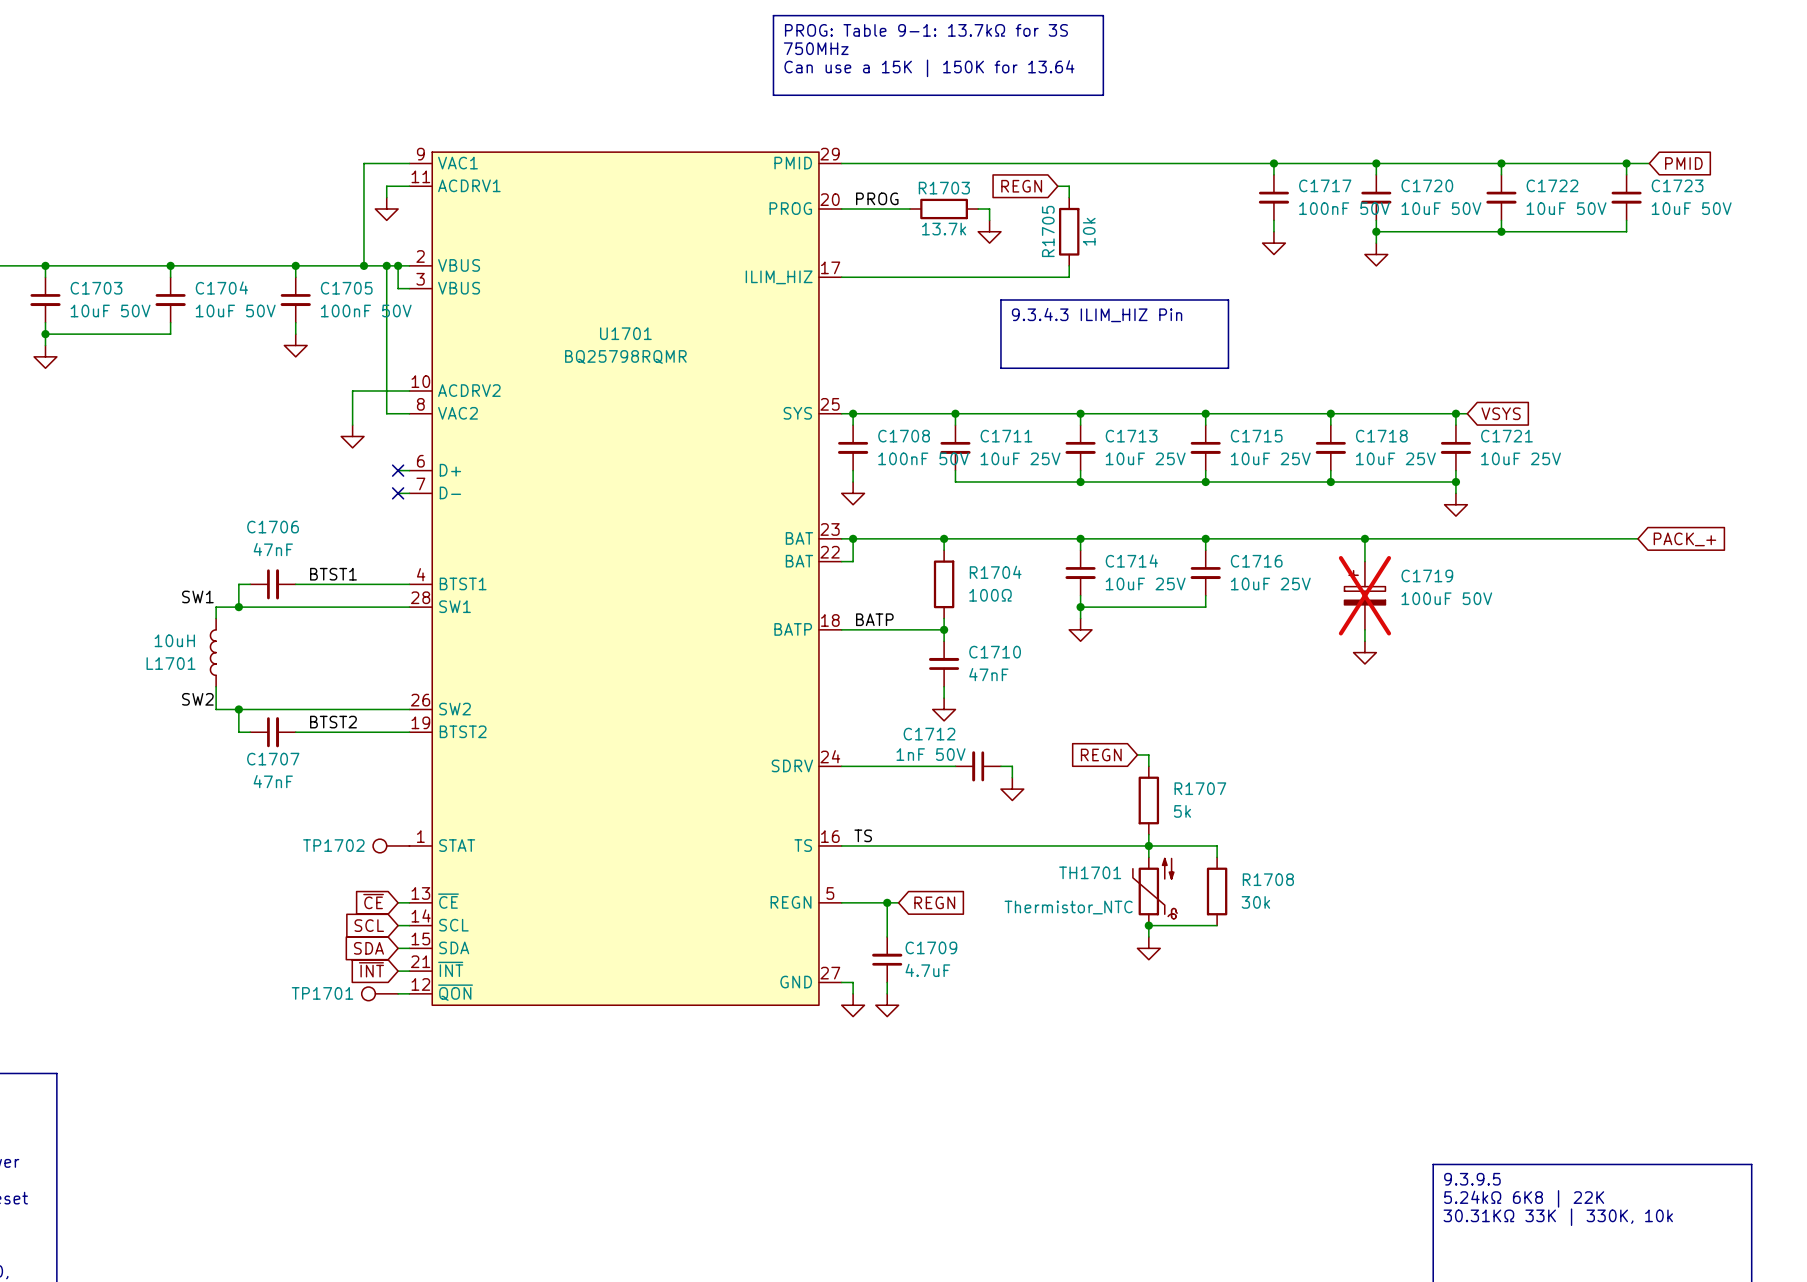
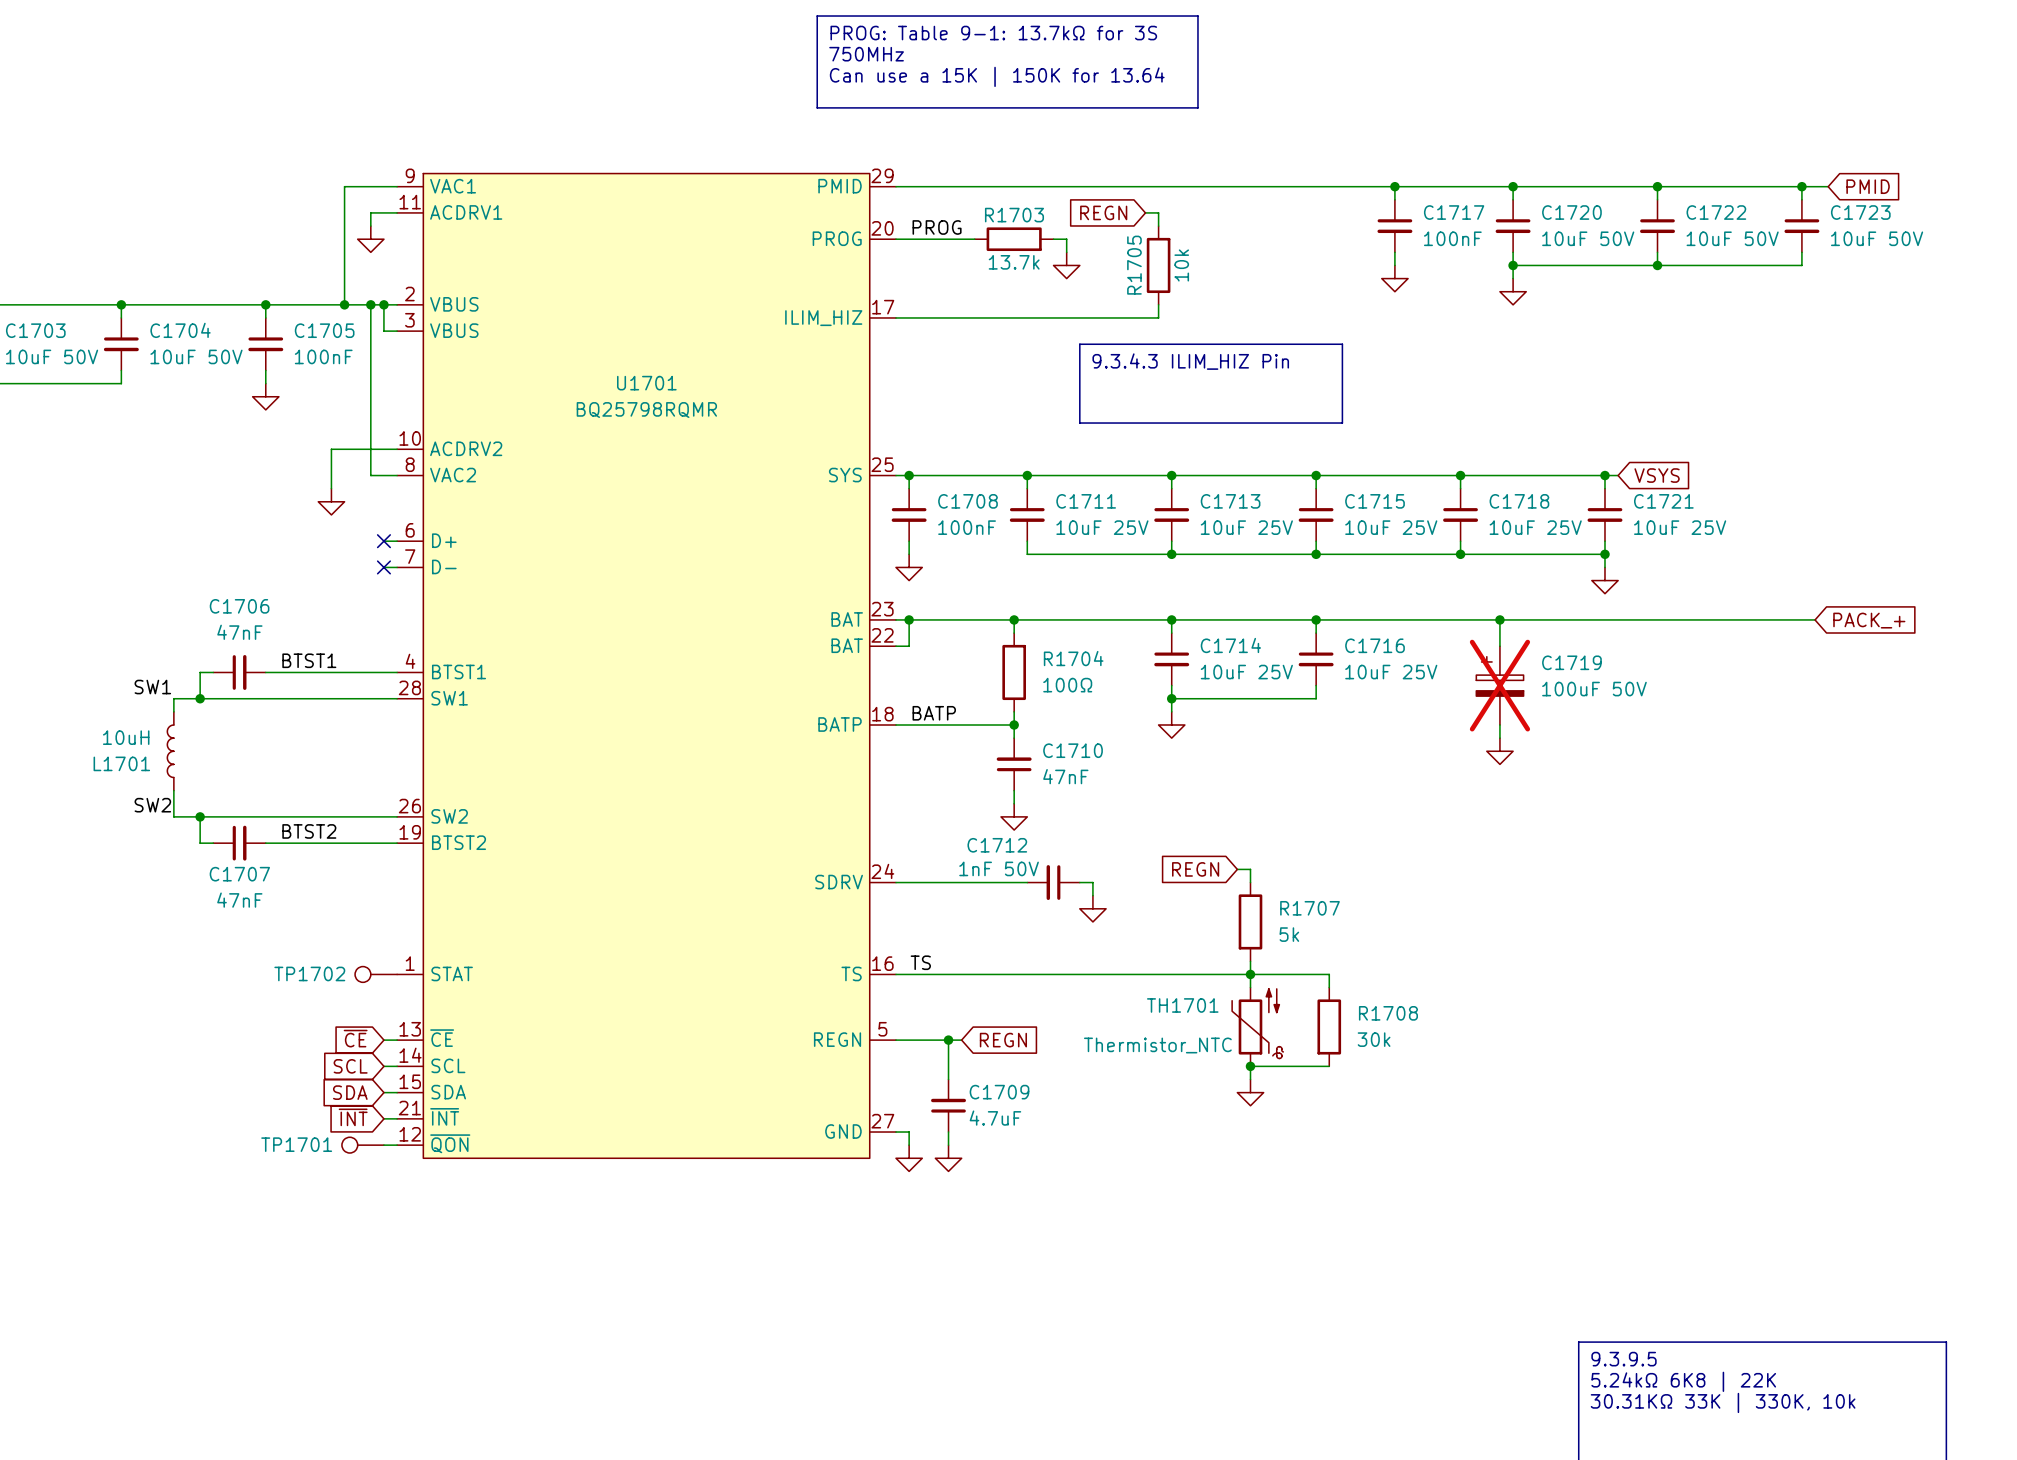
C1717 value: 100nF 50V (1344, 208) -> 100nF (1452, 238)
C1705 value: 100nF 50V (366, 311) -> 100nF (323, 356)
C1708 value: 100nF 50V (923, 458) -> 100nF (967, 527)

